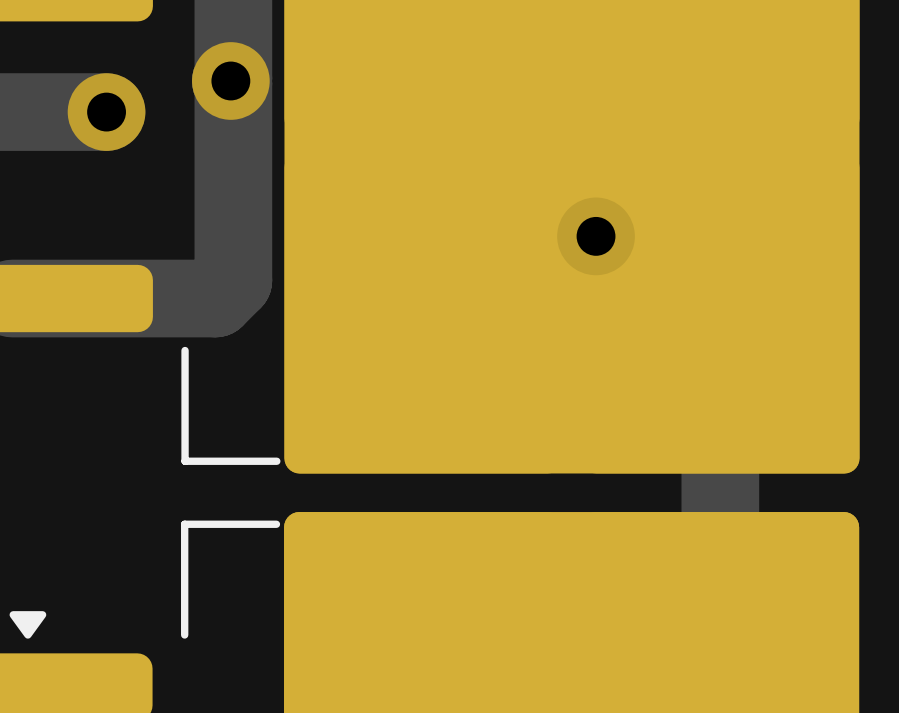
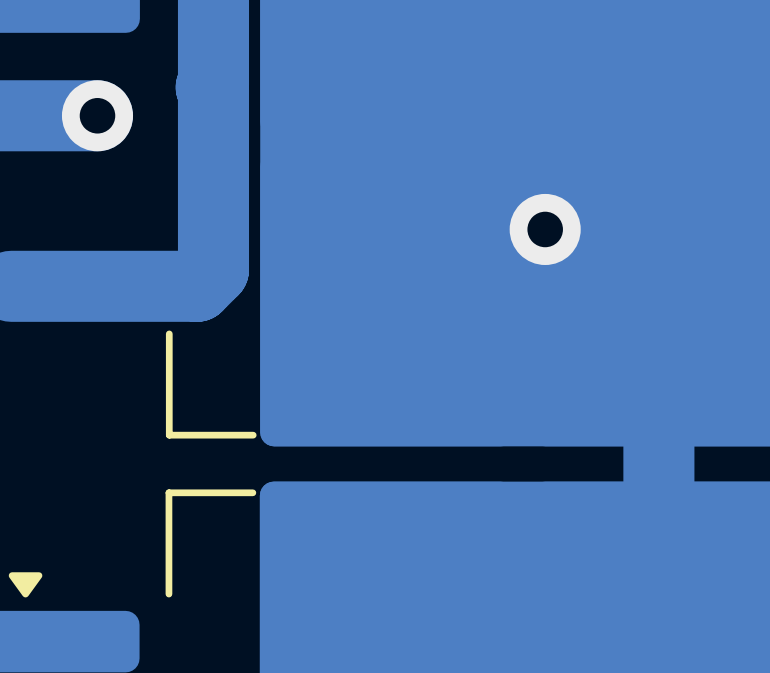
via: (230, 80) -> none

